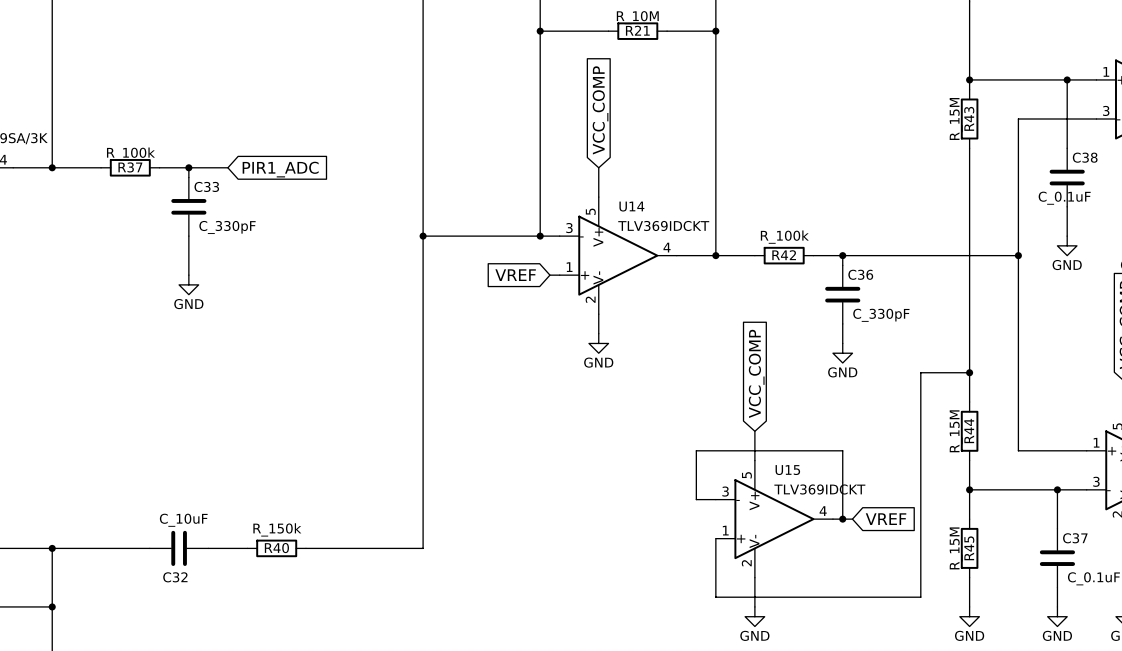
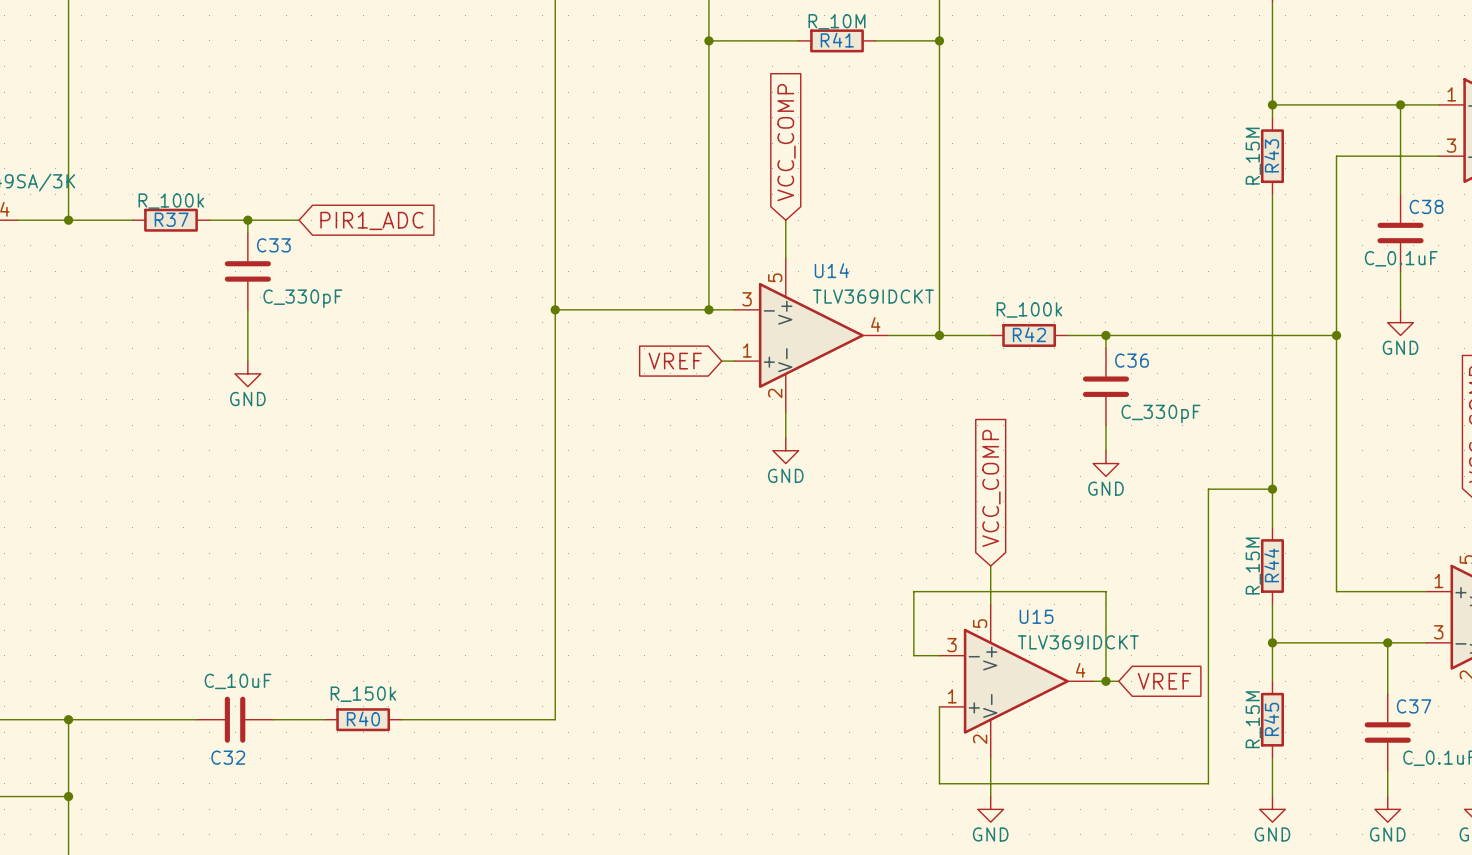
R21 name: R21 (637, 30) -> R41 (837, 40)

